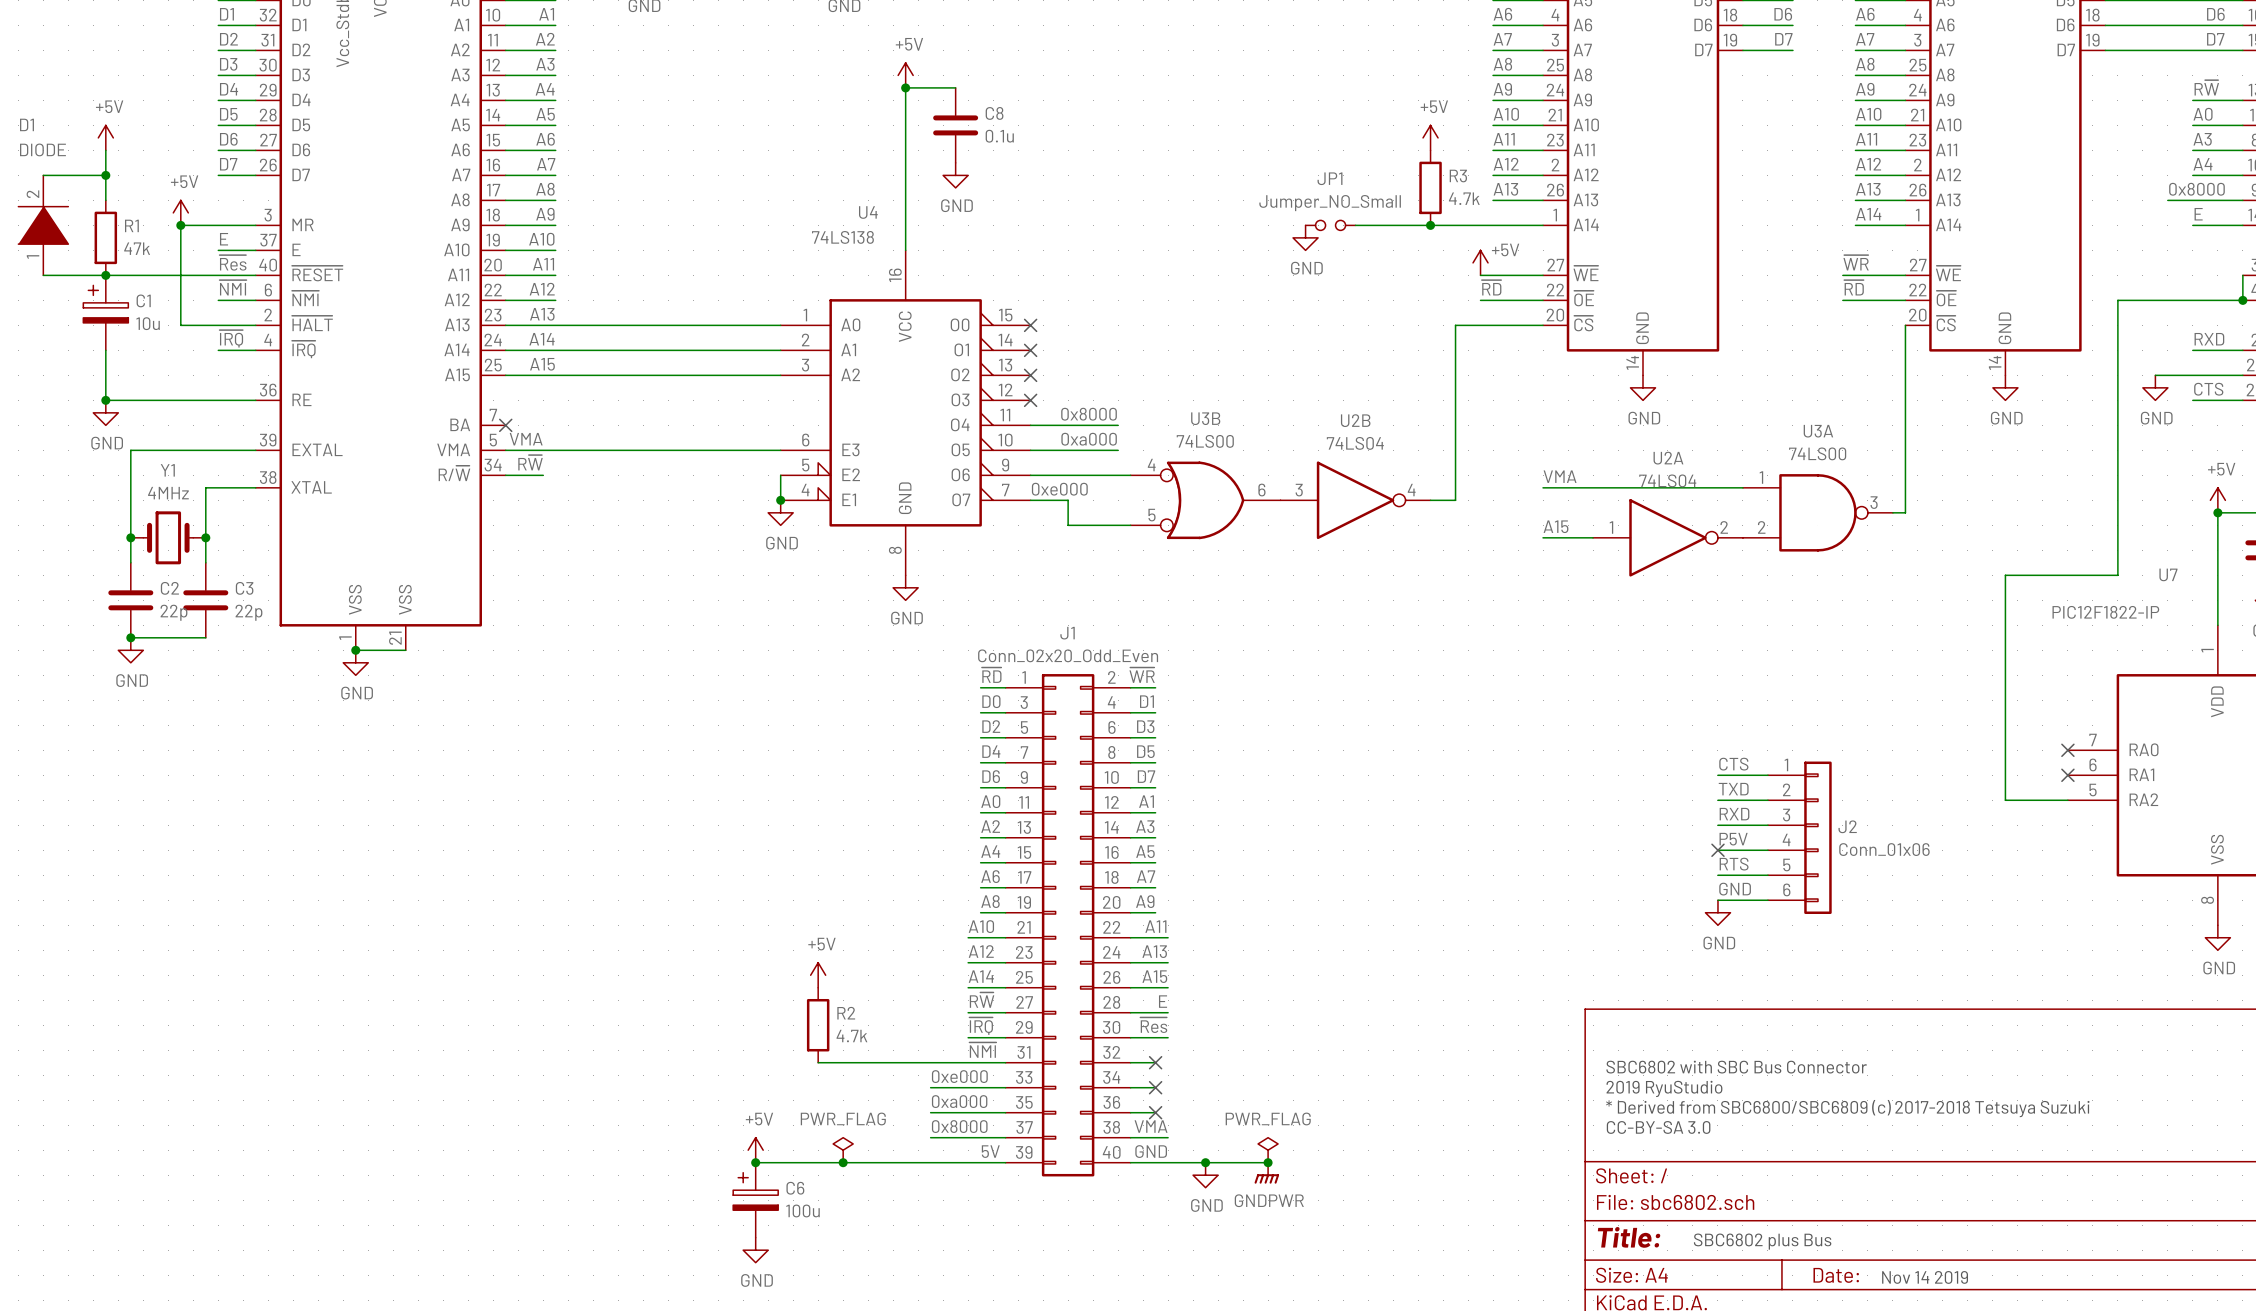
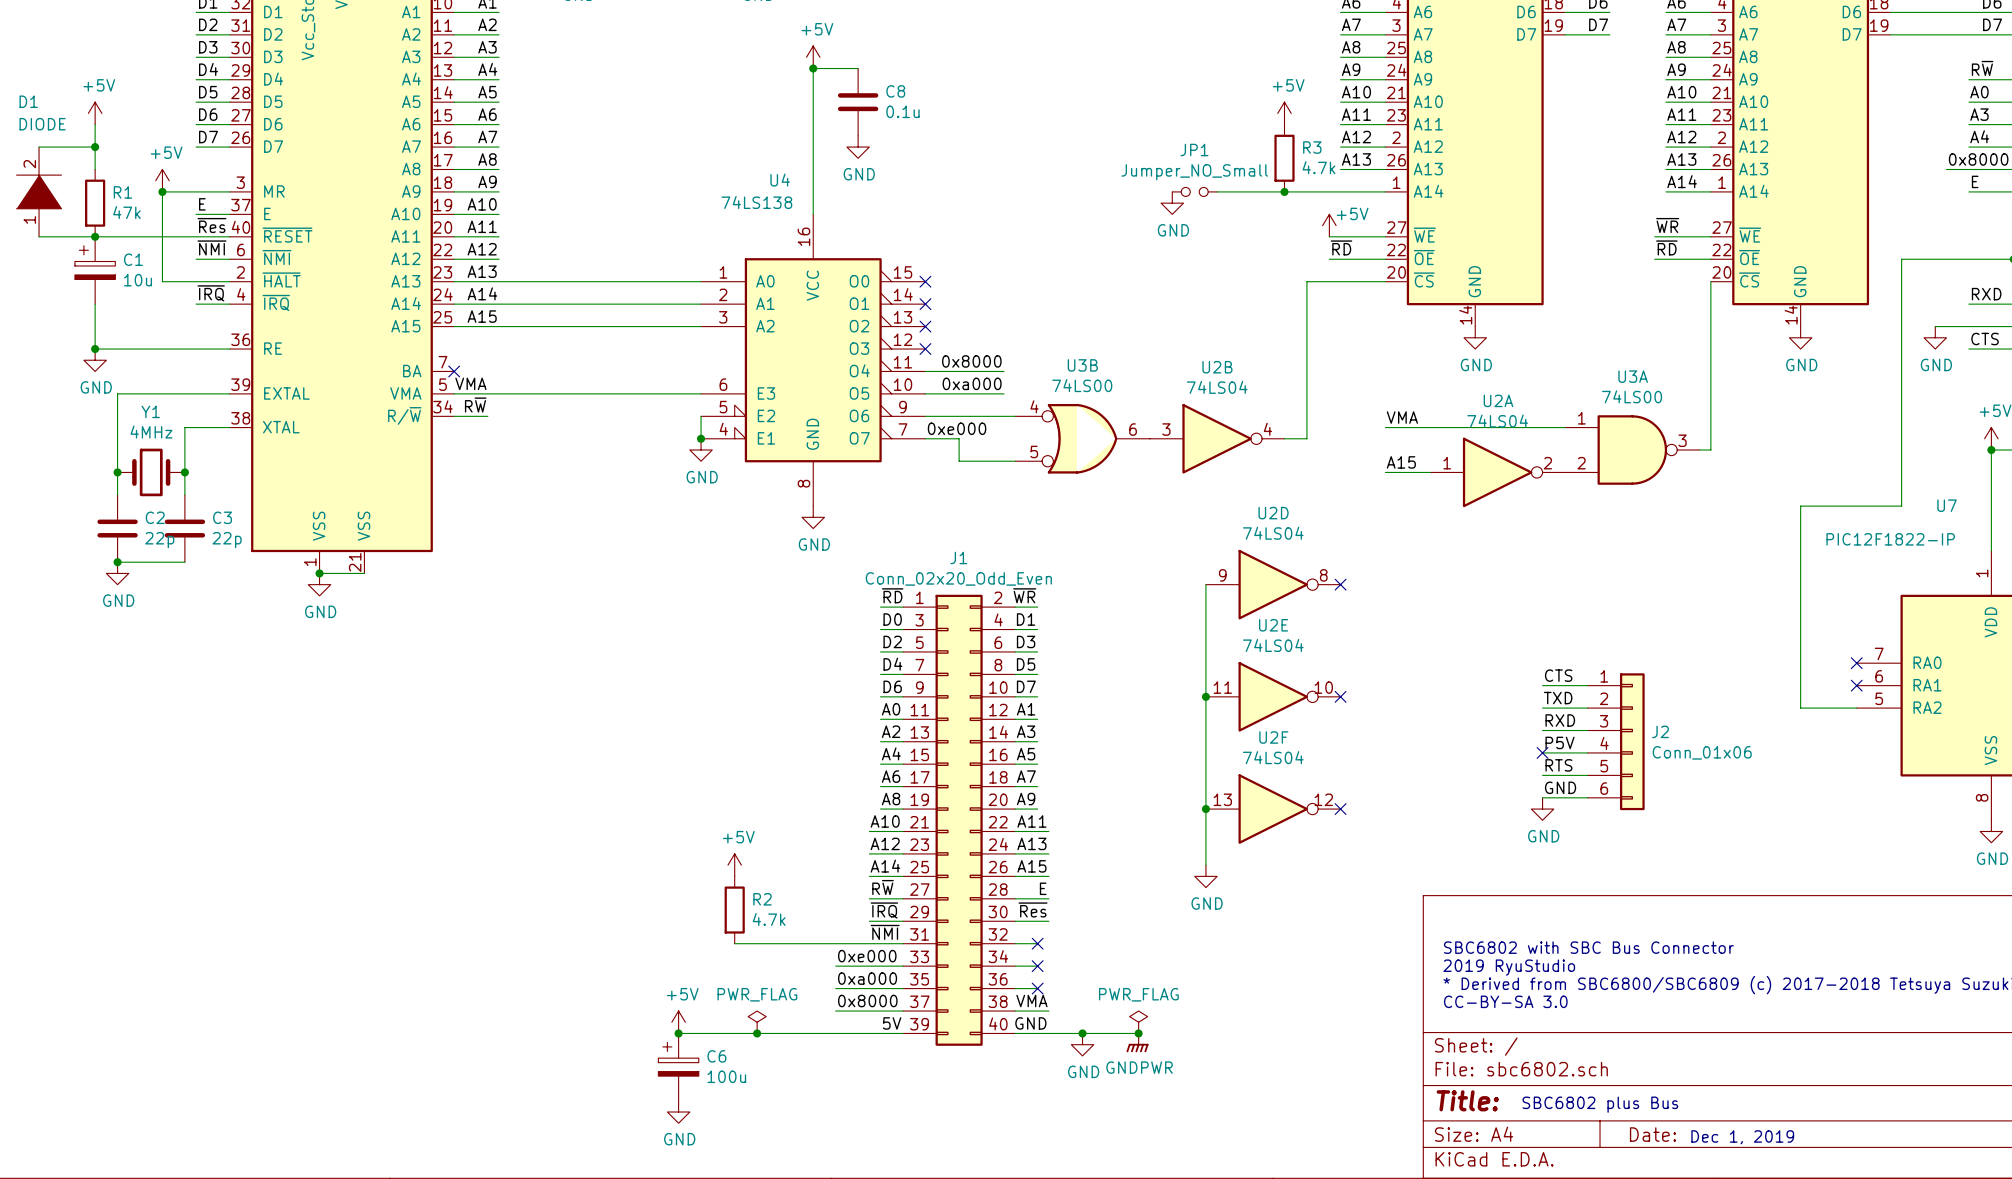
wire: none -> (1205, 584) (1205, 865)
U2D: none -> 74LS04 (1273, 584)
no-connect mark: none -> (1340, 584)
junction: none -> (1205, 696)
U2E: none -> 74LS04 (1273, 696)
no-connect mark: none -> (1340, 696)
junction: none -> (1205, 809)
U2F: none -> 74LS04 (1273, 809)
no-connect mark: none -> (1340, 809)
power symbol: none -> GND (1205, 876)
text: Nov 14 2019 (1925, 1277) -> Dec 1, 2019 (1742, 1137)

